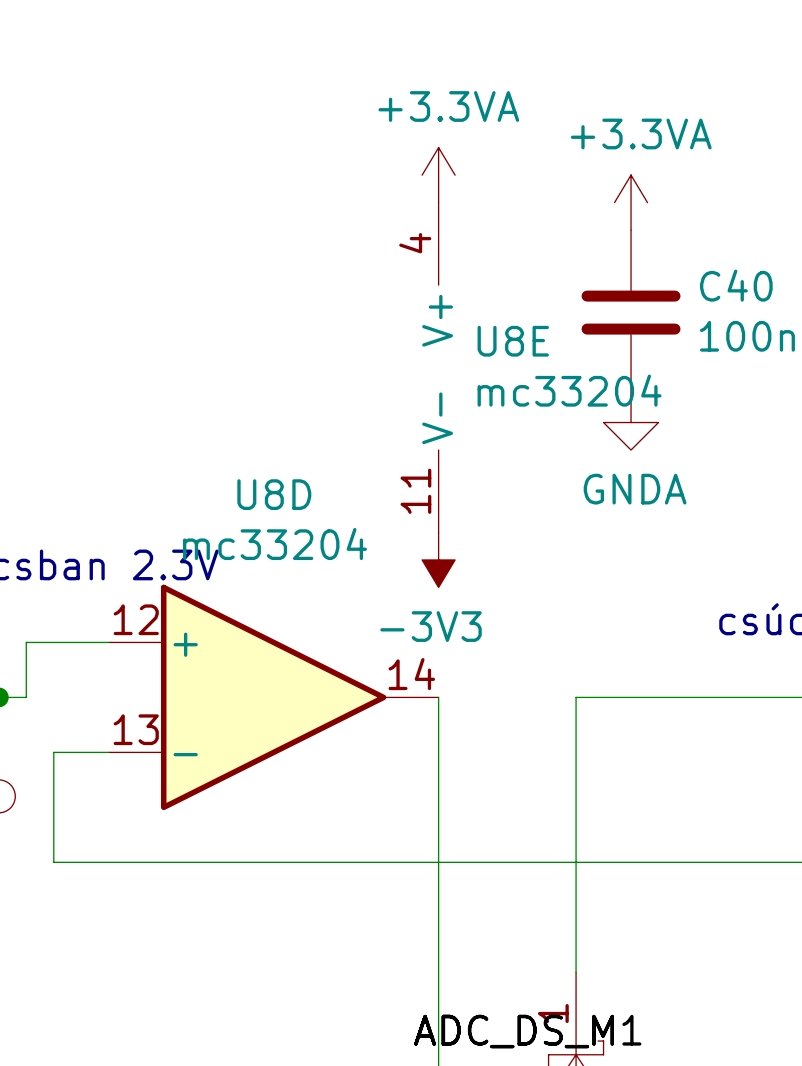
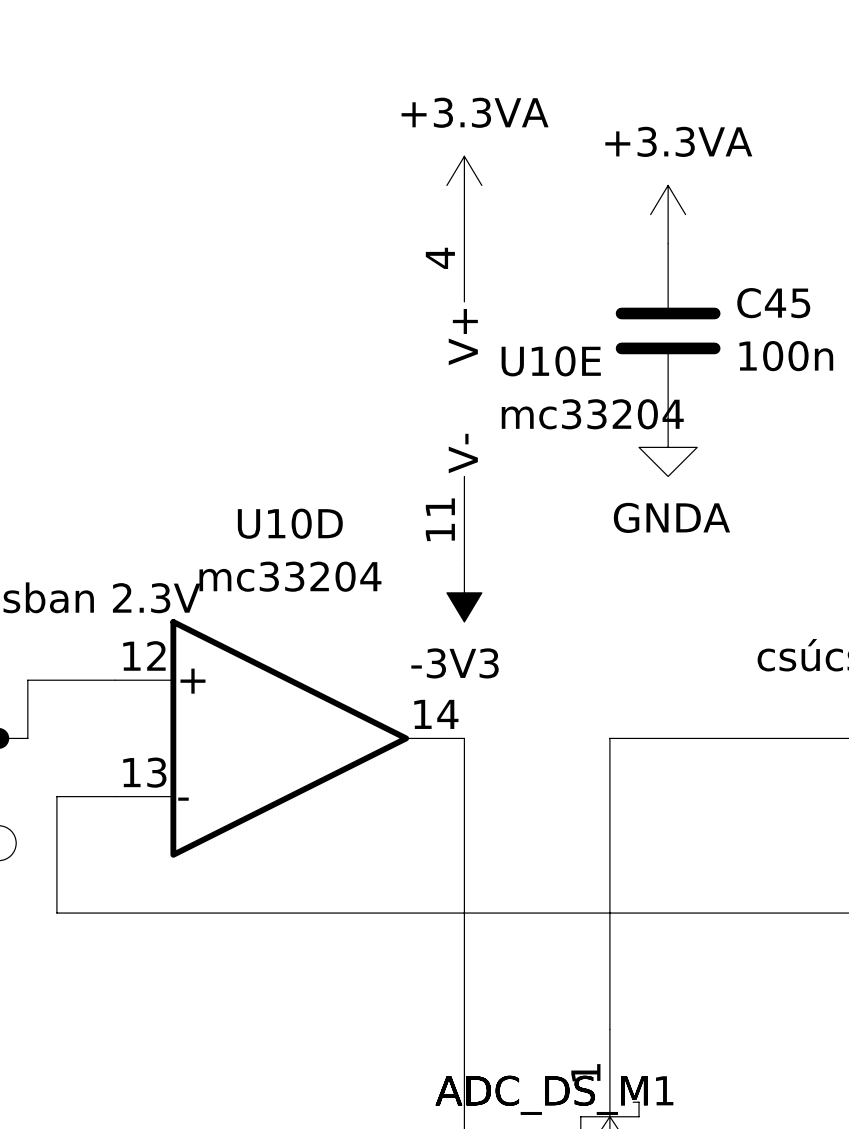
C40 name: C40 (736, 285) -> C45 (773, 303)
U8E name: U8E (513, 341) -> U10E (551, 361)
U8D name: U8D (274, 494) -> U10D (290, 523)

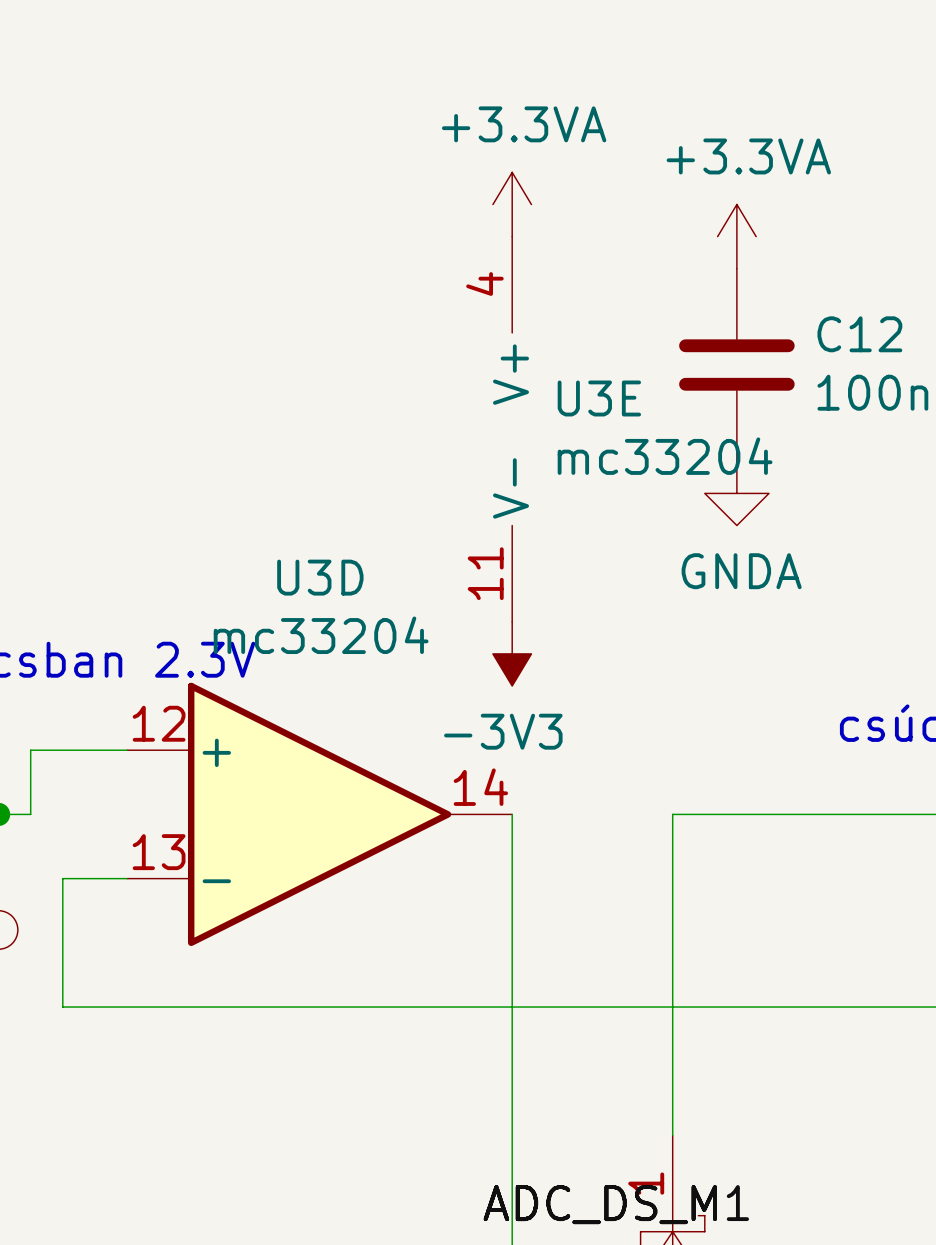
C45 name: C45 (773, 303) -> C12 (859, 334)
U10E name: U10E (551, 361) -> U3E (599, 398)
U10D name: U10D (290, 523) -> U3D (320, 577)

